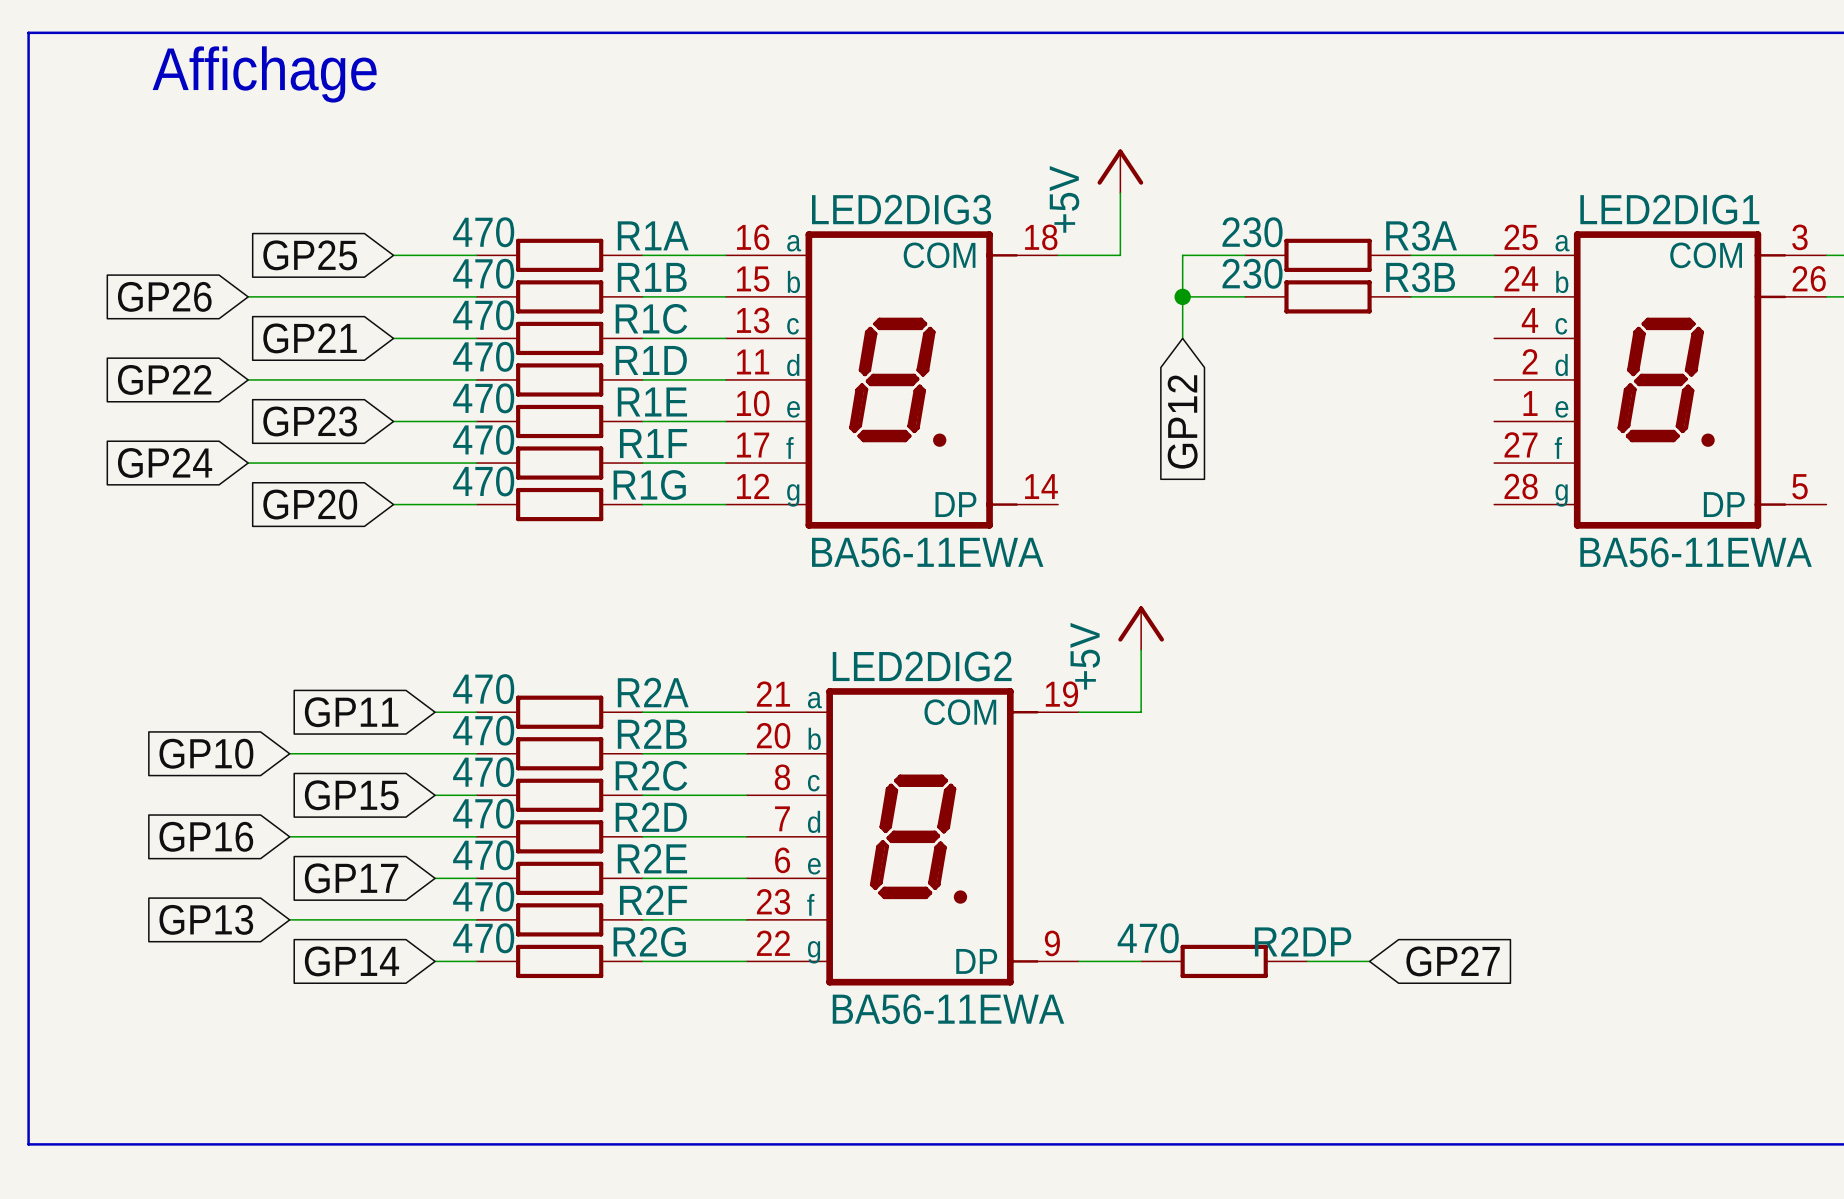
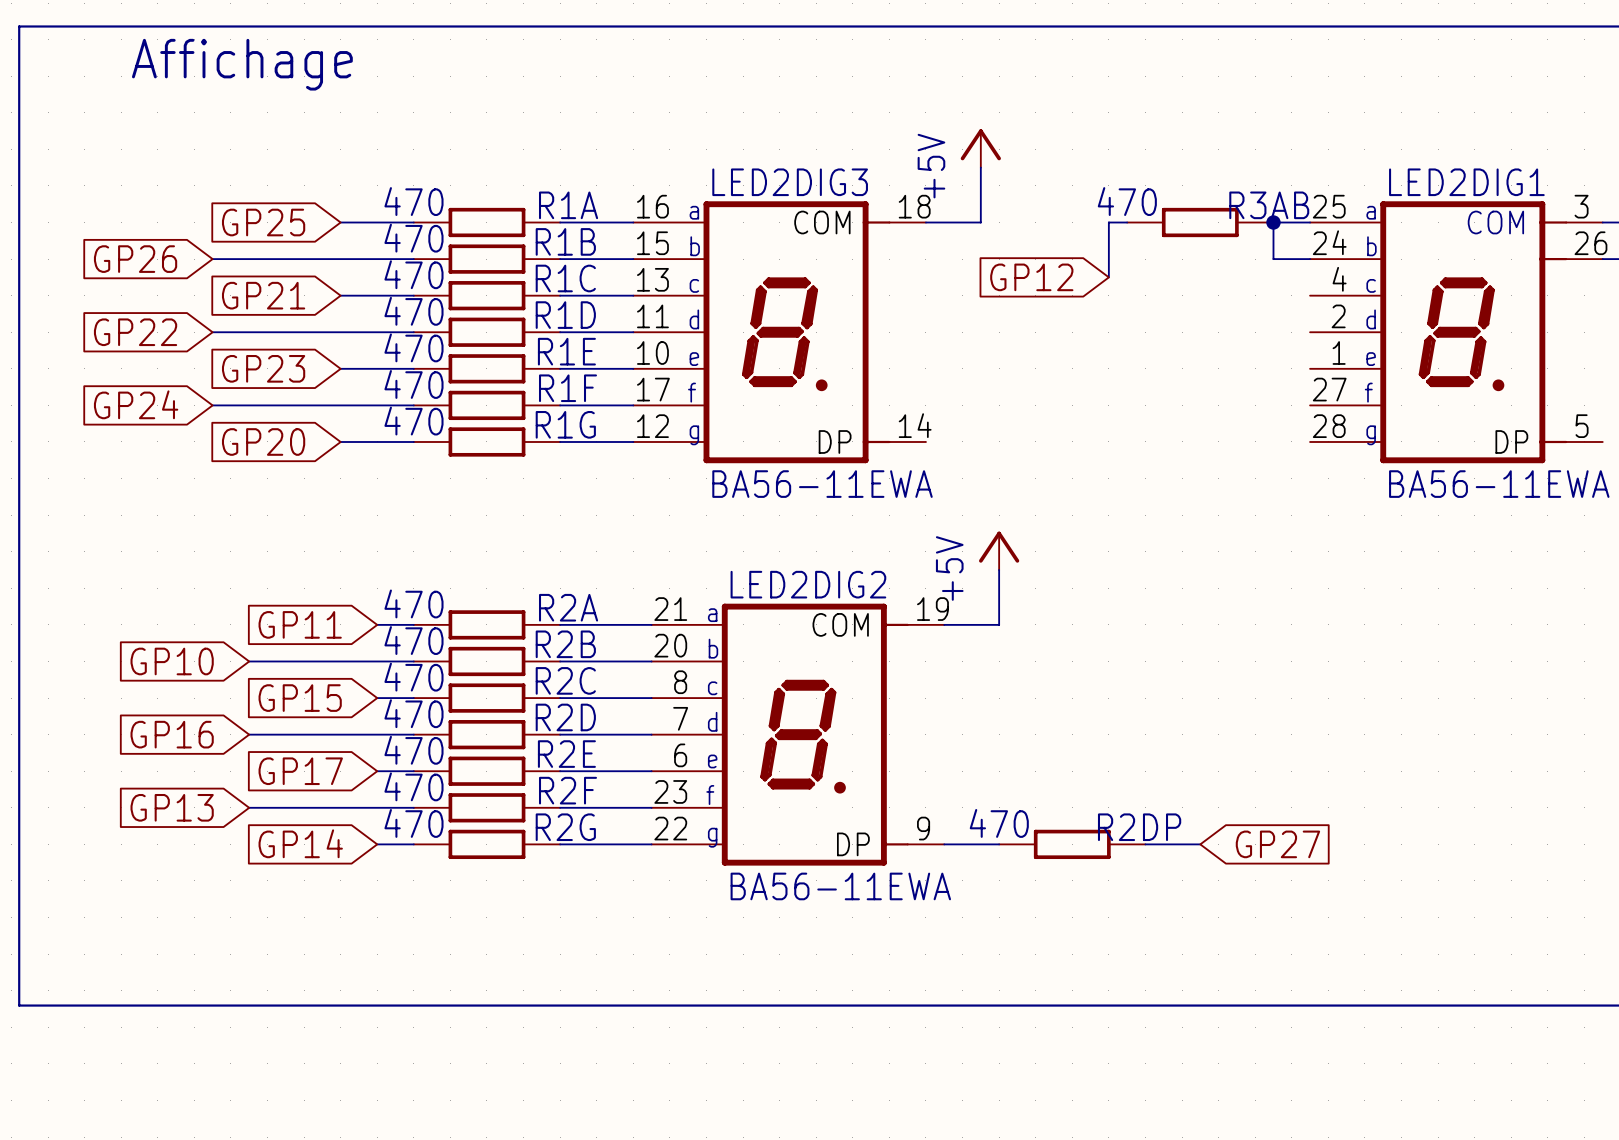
wire: (1244, 255) (1182, 255) (1182, 338) -> none
wire: none -> (1127, 222) (1108, 222) (1108, 277)
R3A: 230 (1328, 255) -> none
R3AB: none -> 470 (1200, 222)
junction: none -> (1273, 222)
wire: (1182, 296) (1244, 296) -> none
junction: (1182, 296) -> none
R3B: 230 (1328, 296) -> none
wire: (1411, 296) (1452, 296) -> none
global label rotation: 0° (1182, 421) -> 90° clockwise (1031, 277)

